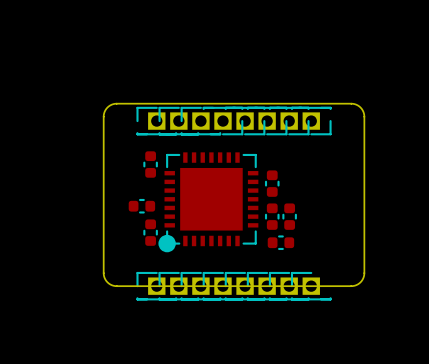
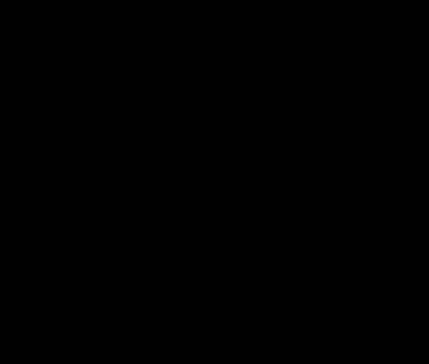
board edge: (116, 103) (351, 103) (359, 106) (364, 116) (364, 273) (361, 281) (351, 286) (116, 286) (108, 283) (103, 273) (103, 116) (107, 107) (116, 103) -> none
part: (156, 121) -> none
part: (178, 121) -> none
part: (200, 121) -> none
part: (222, 121) -> none
part: (245, 121) -> none
part: (267, 121) -> none
part: (289, 121) -> none
part: (311, 121) -> none
part: (150, 164) -> none
part: (272, 183) -> none
part: (208, 202) -> none
part: (141, 206) -> none
part: (272, 216) -> none
part: (289, 216) -> none
part: (150, 232) -> none
part: (280, 242) -> none
part: (156, 286) -> none
part: (178, 286) -> none
part: (200, 286) -> none
part: (222, 286) -> none
part: (245, 286) -> none
part: (267, 286) -> none
part: (289, 286) -> none
part: (311, 286) -> none

